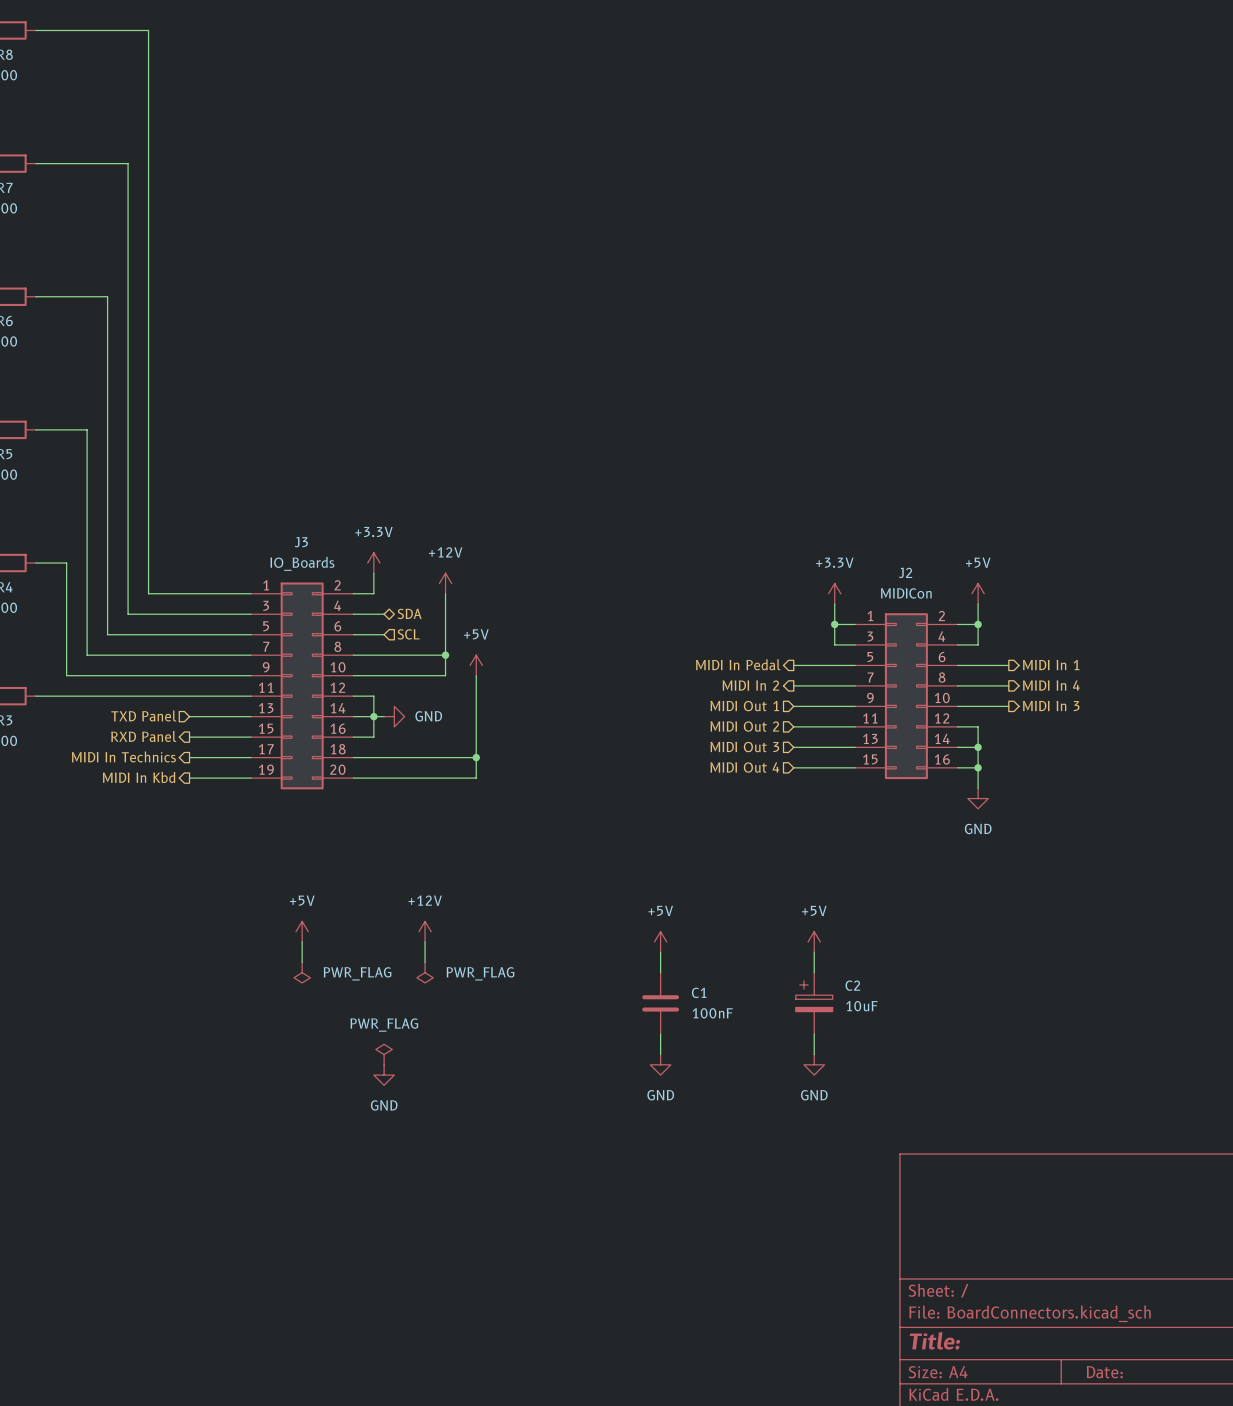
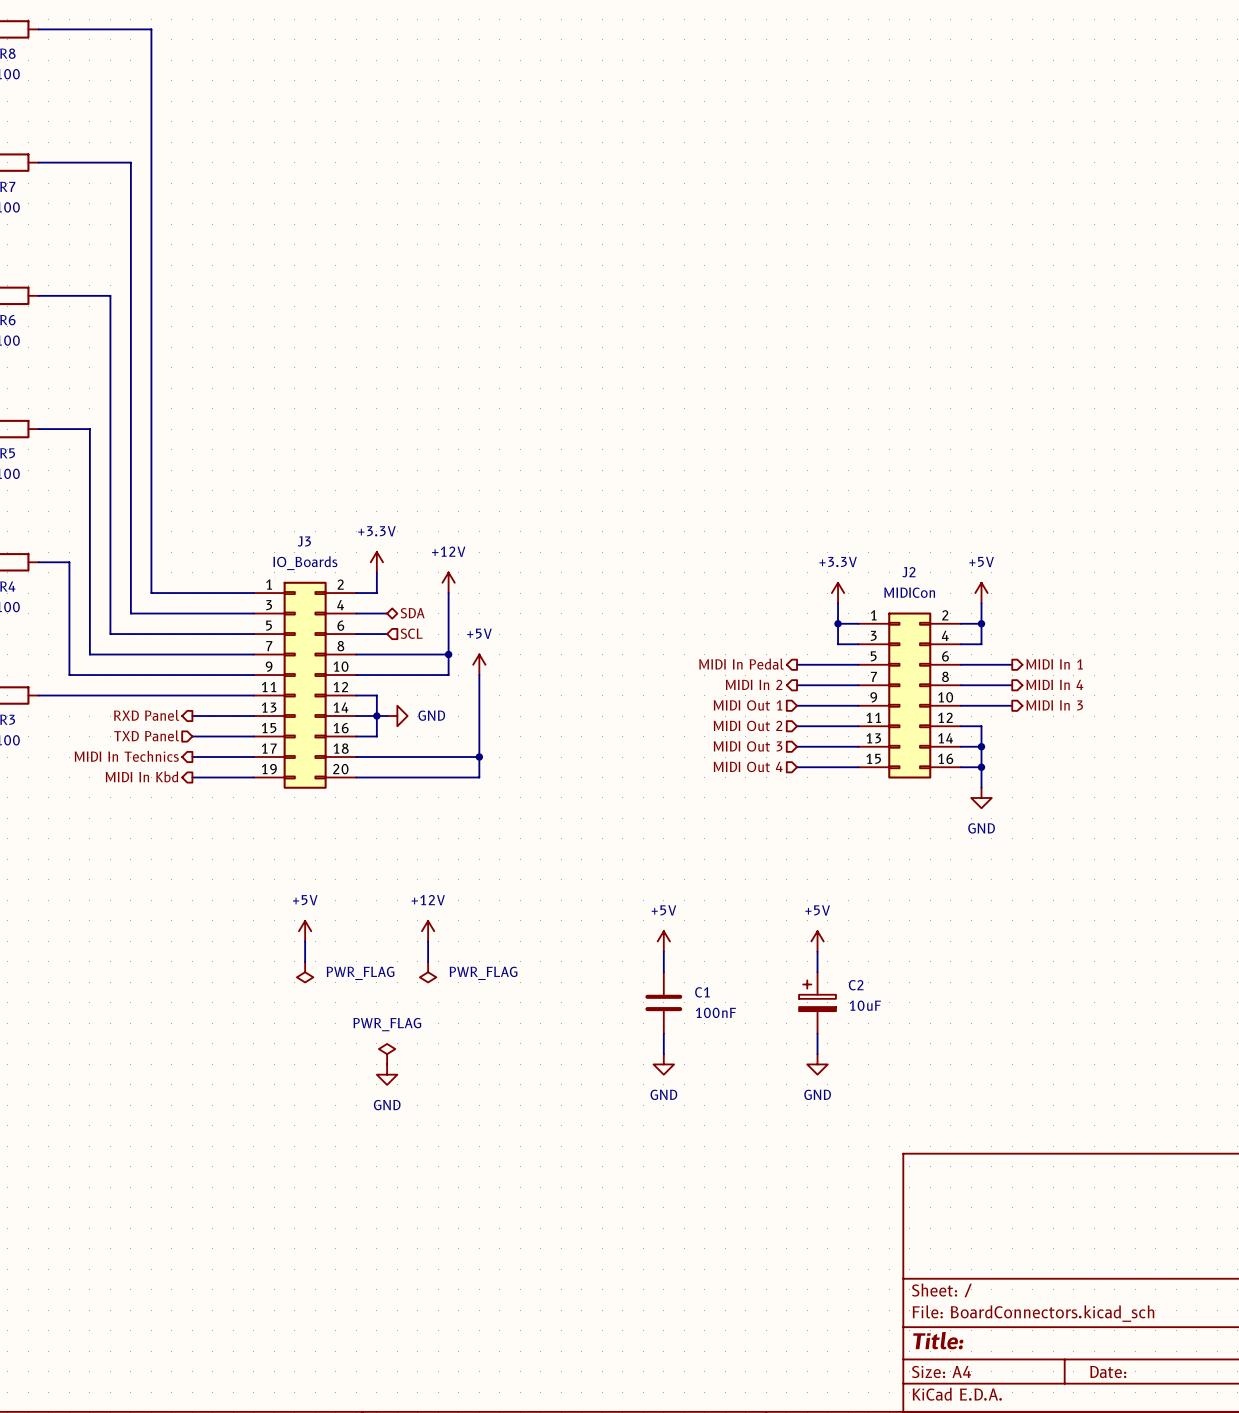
hierarchical label shape: input (143, 715) -> output (146, 715)
hierarchical label: TXD Panel (143, 715) -> RXD Panel (146, 715)
hierarchical label shape: output (143, 736) -> input (146, 735)
hierarchical label: RXD Panel (143, 736) -> TXD Panel (146, 735)

